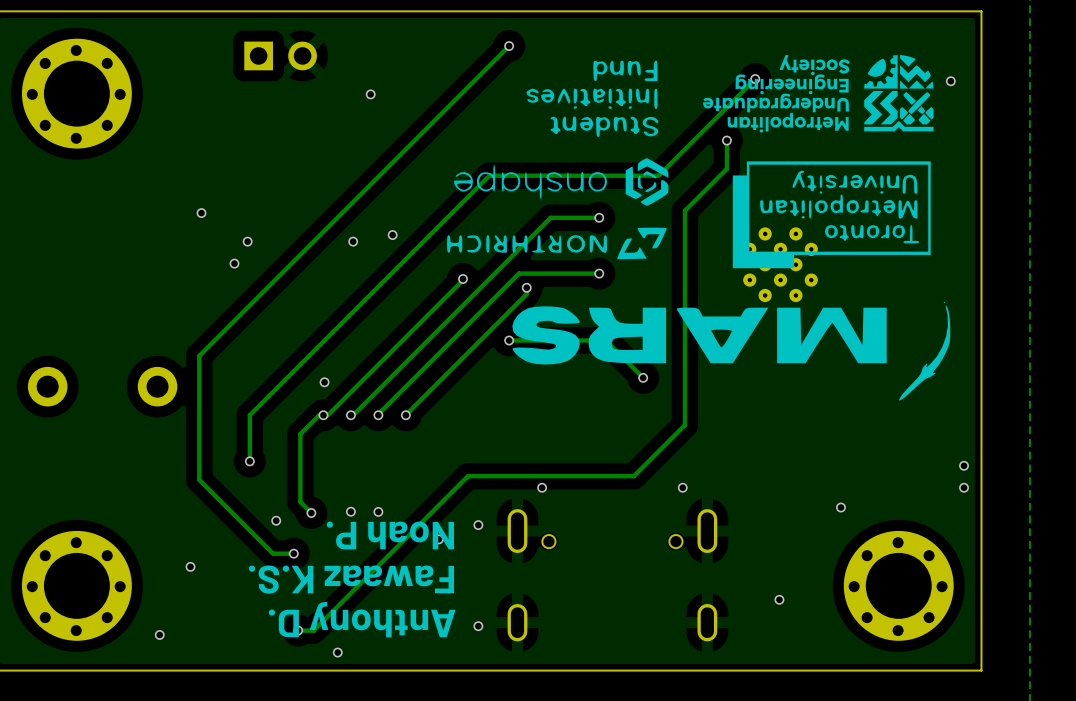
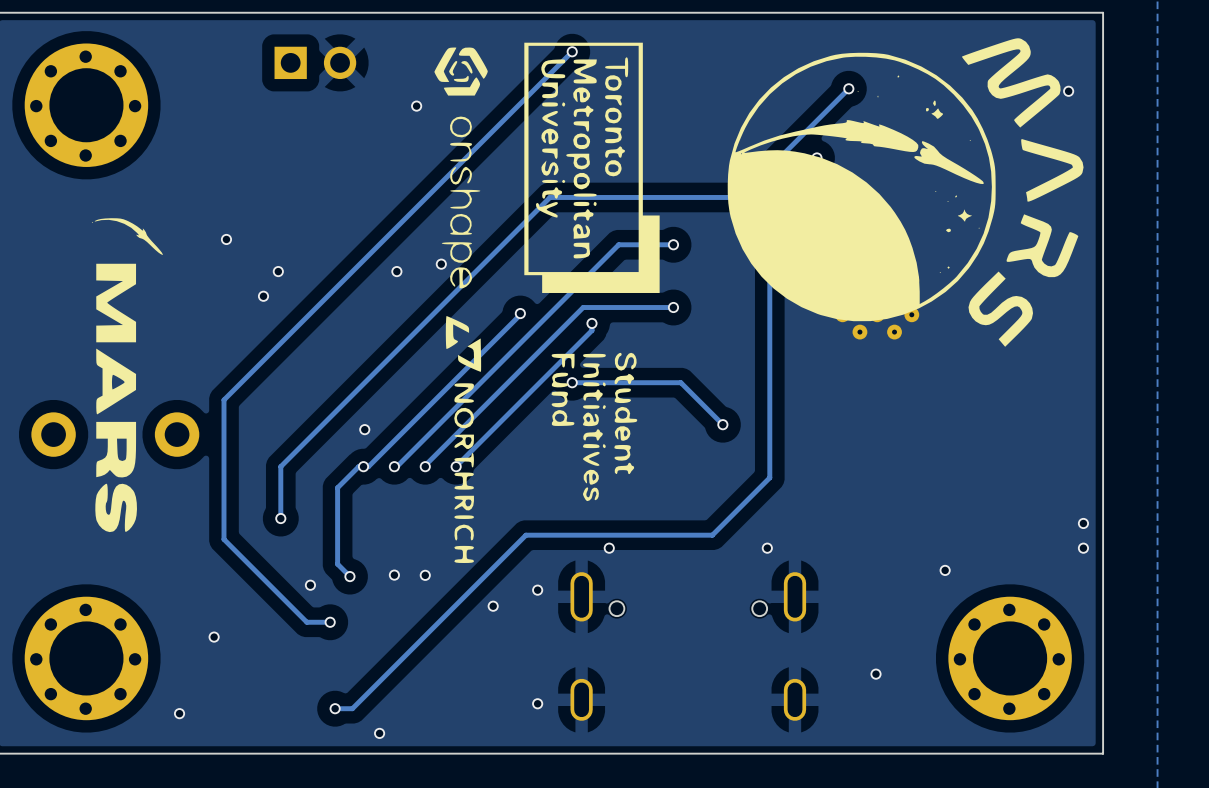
drawing: none -> [727, 38, 1084, 347]
drawing: none -> [524, 42, 660, 293]
drawing: none -> [434, 47, 488, 564]
drawing: [703, 55, 934, 133] -> none
drawing: [447, 60, 669, 260] -> none
drawing: [732, 161, 931, 269] -> none
drawing: none -> [92, 218, 163, 533]
drawing: [512, 301, 951, 401] -> none
drawing: none -> [551, 352, 638, 502]
text: Noah P. (390, 535) -> none
text: Fawaaz K.S. (351, 579) -> none
text: Anthony D. (362, 619) -> none

